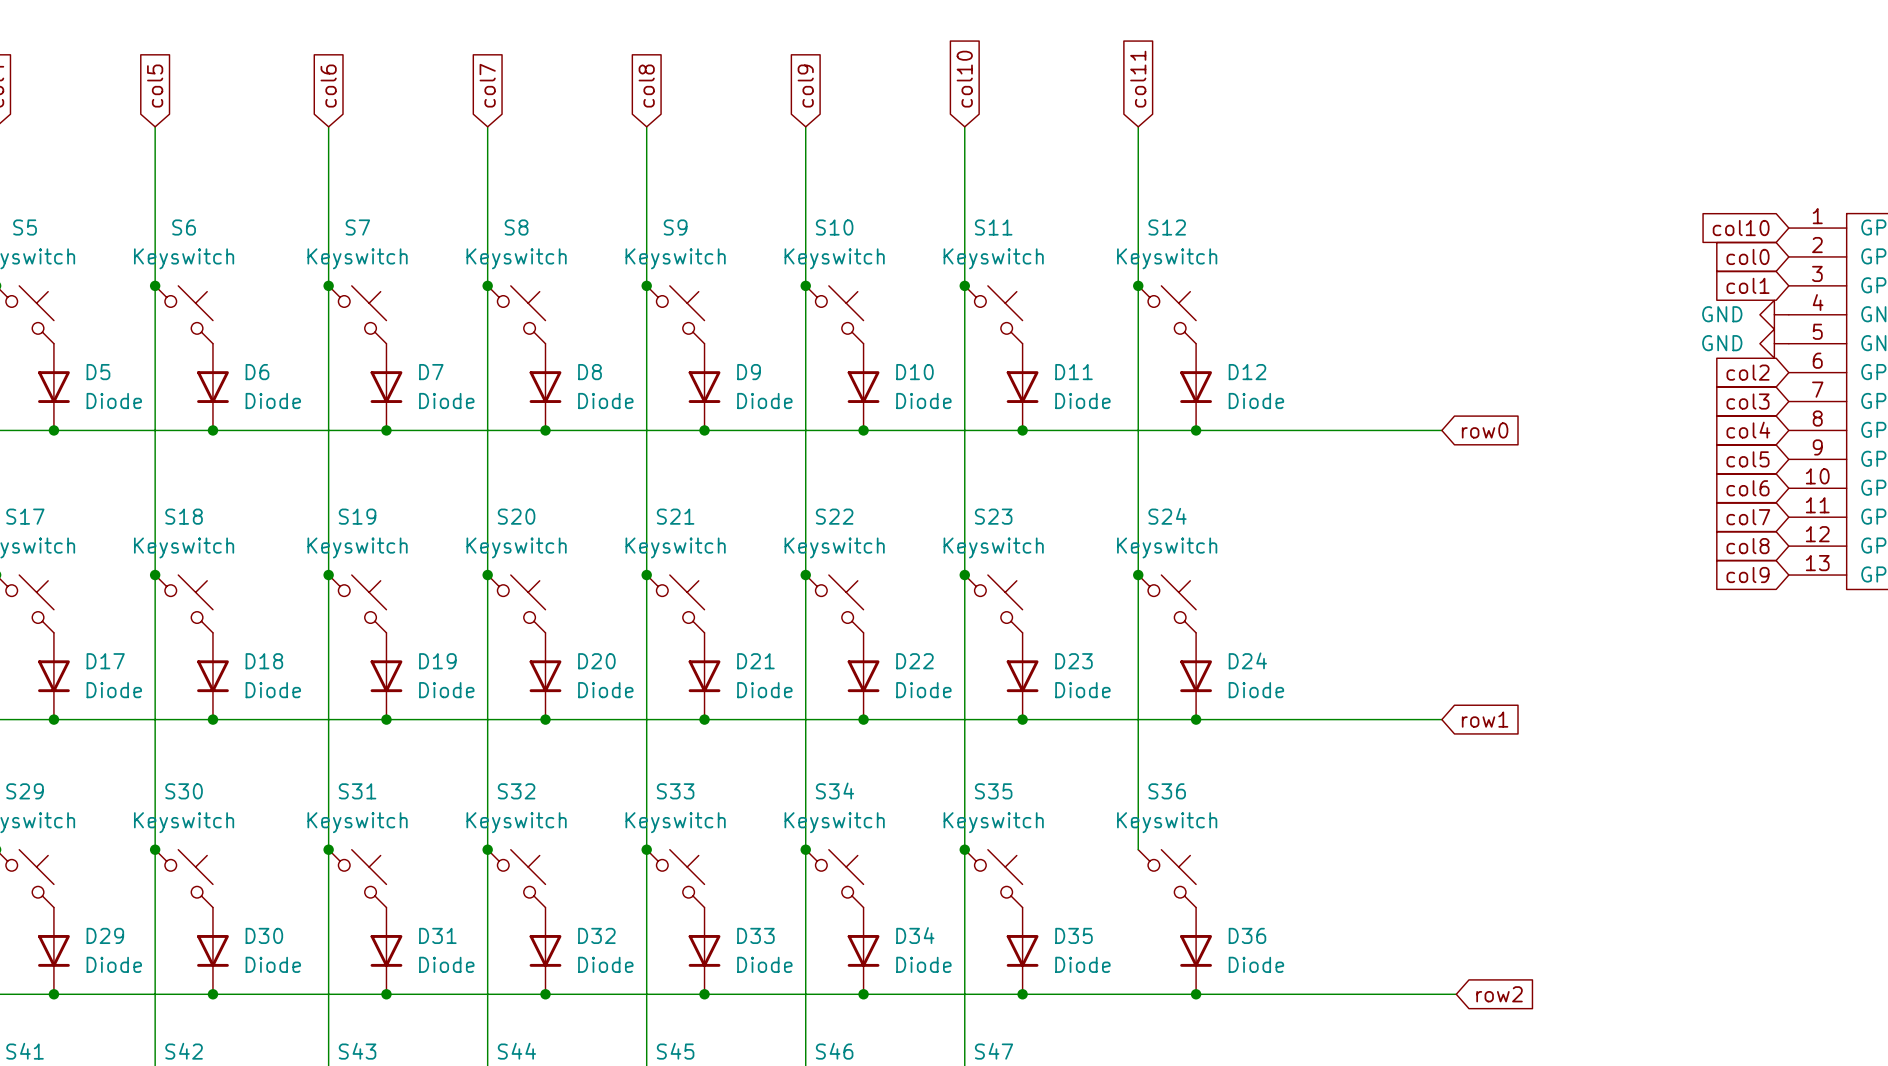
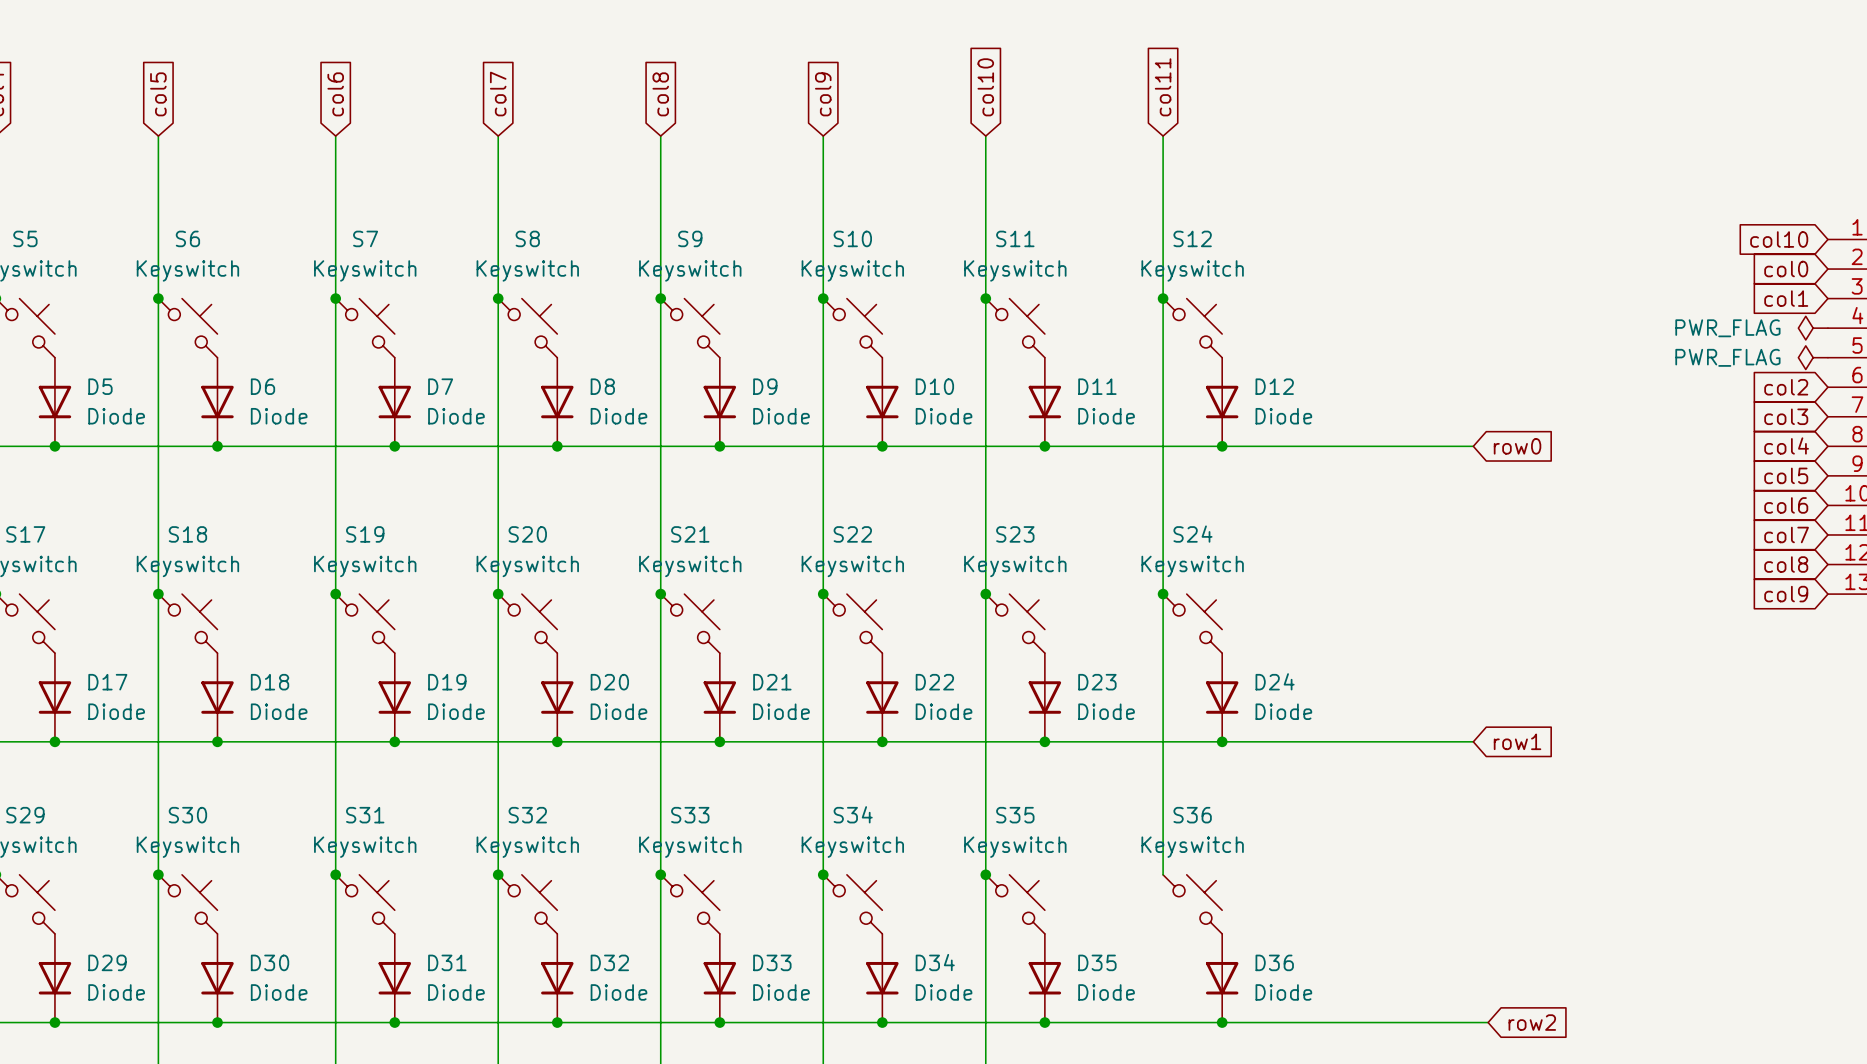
power symbol: GND (1774, 314) -> PWR_FLAG (1813, 328)
power symbol: GND (1774, 343) -> PWR_FLAG (1813, 357)

